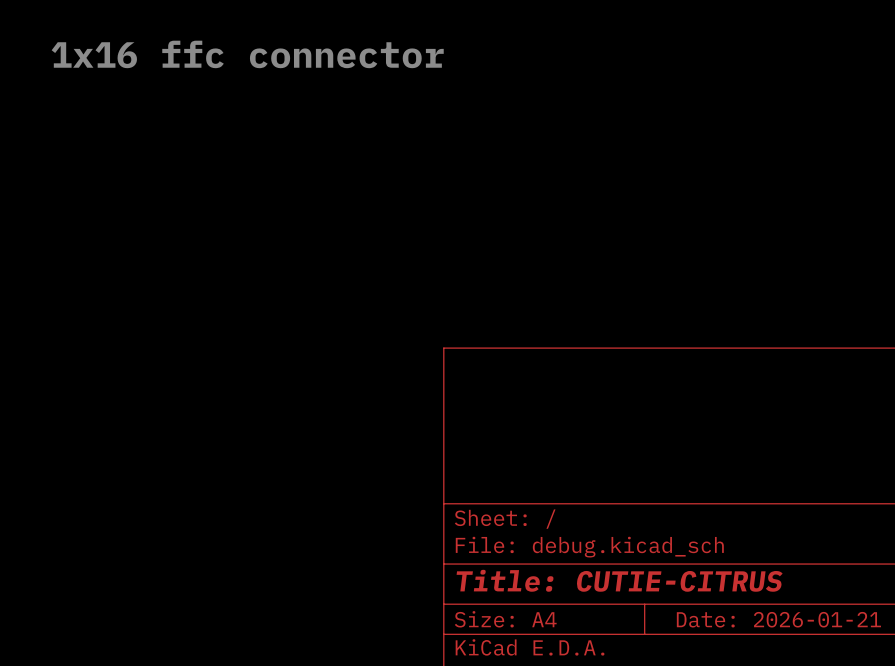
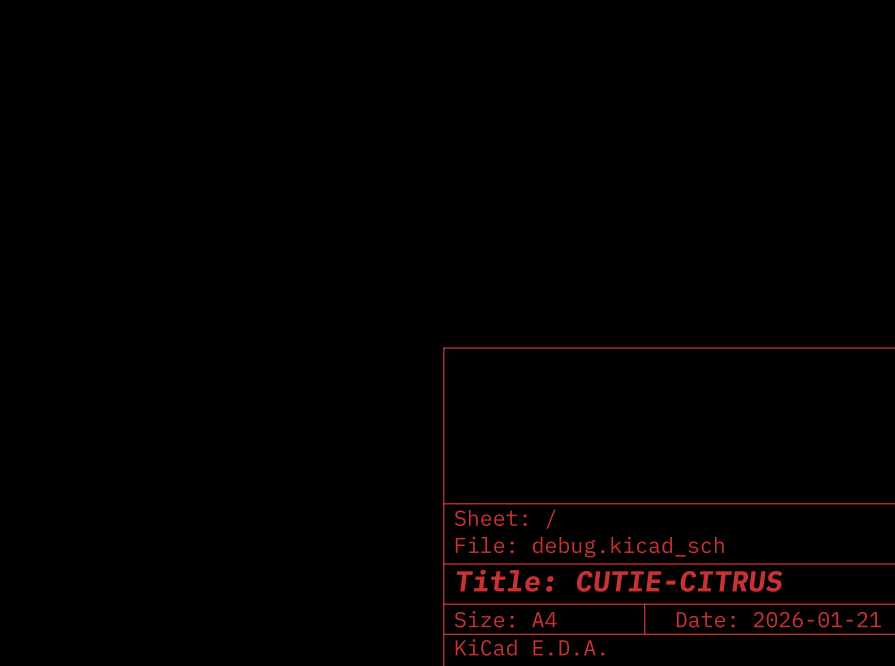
text: 1x16 ffc connector (247, 54) -> none

